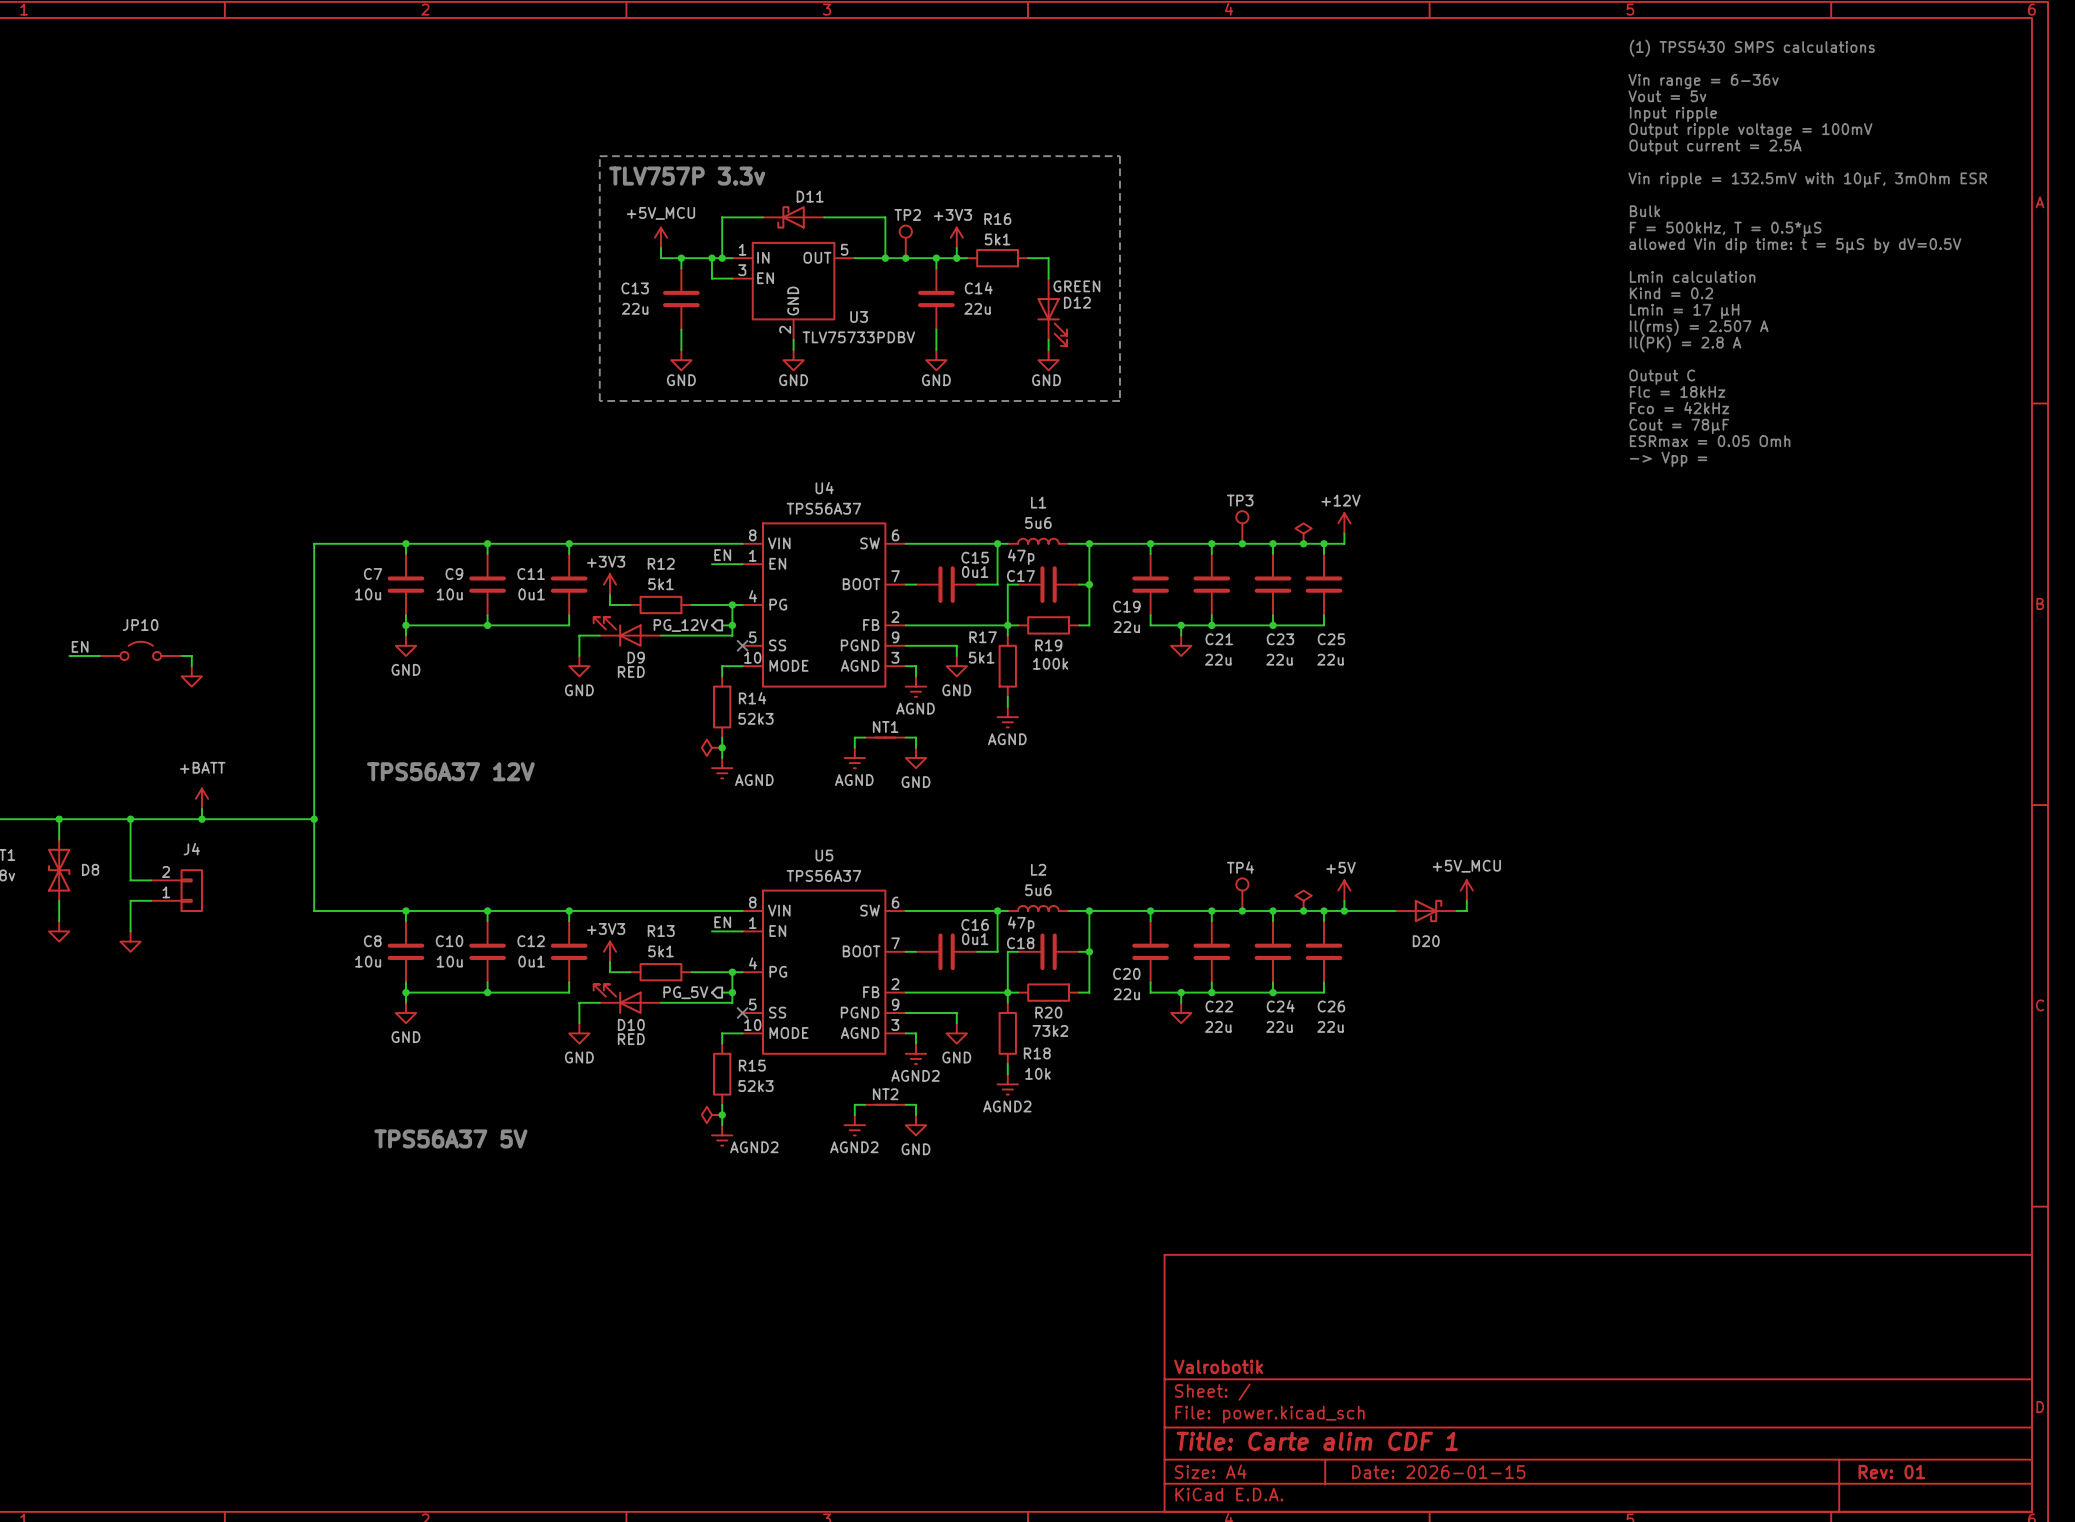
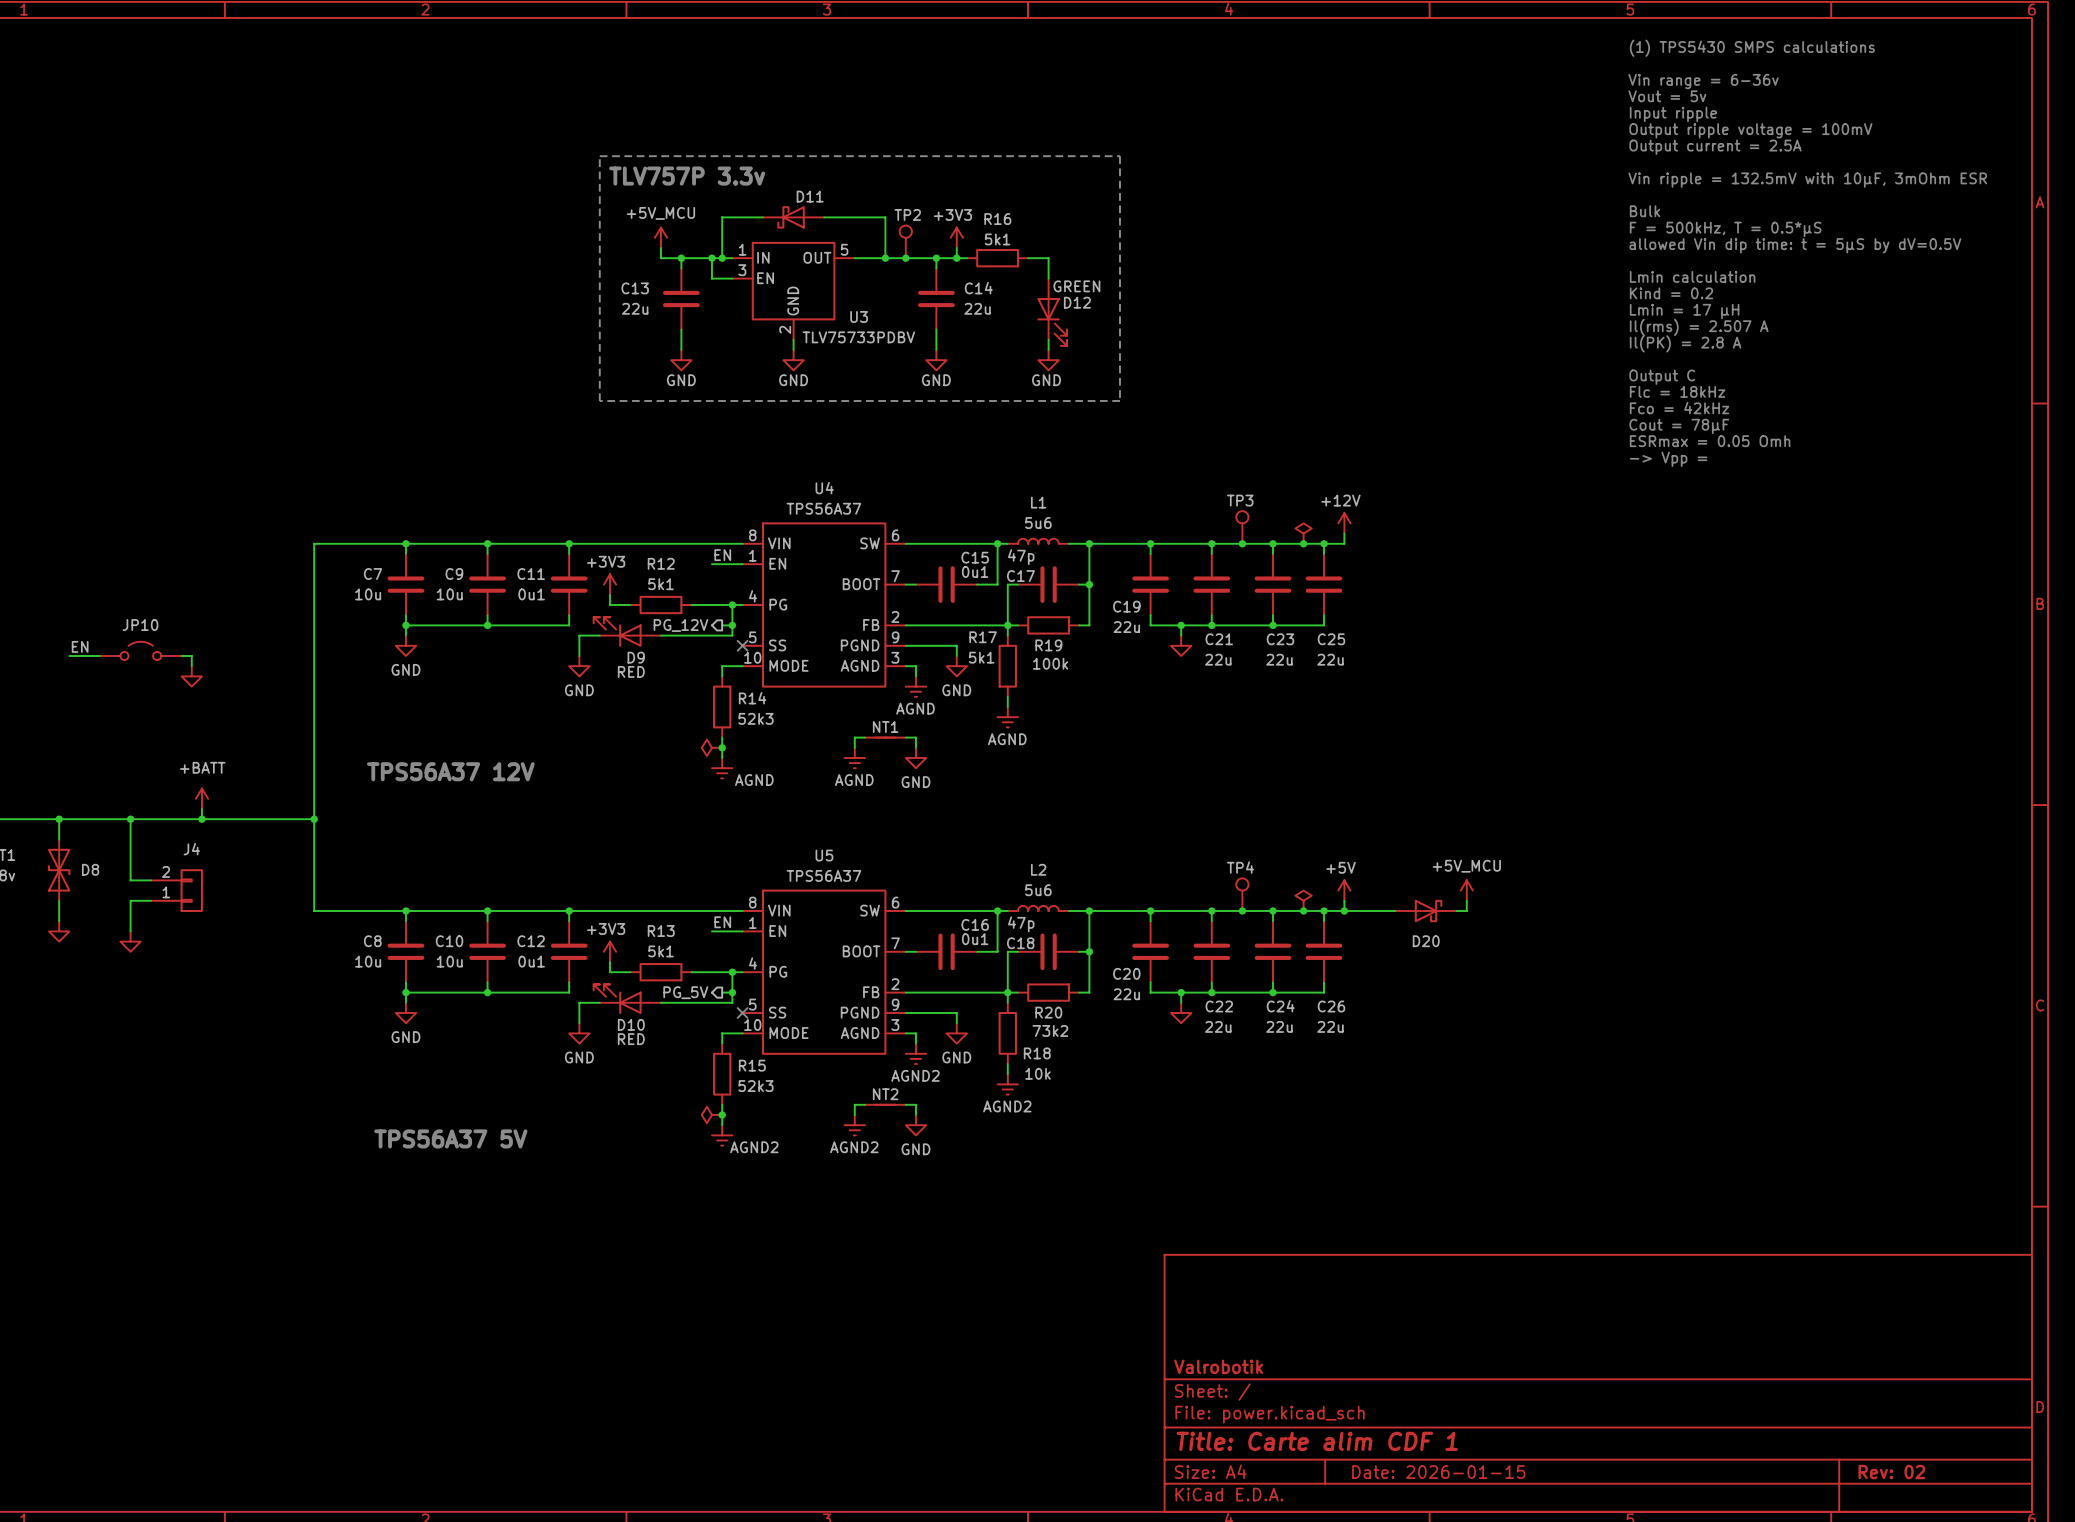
title block: Rev: 01 (1891, 1472) -> Rev: 02 (1891, 1472)

